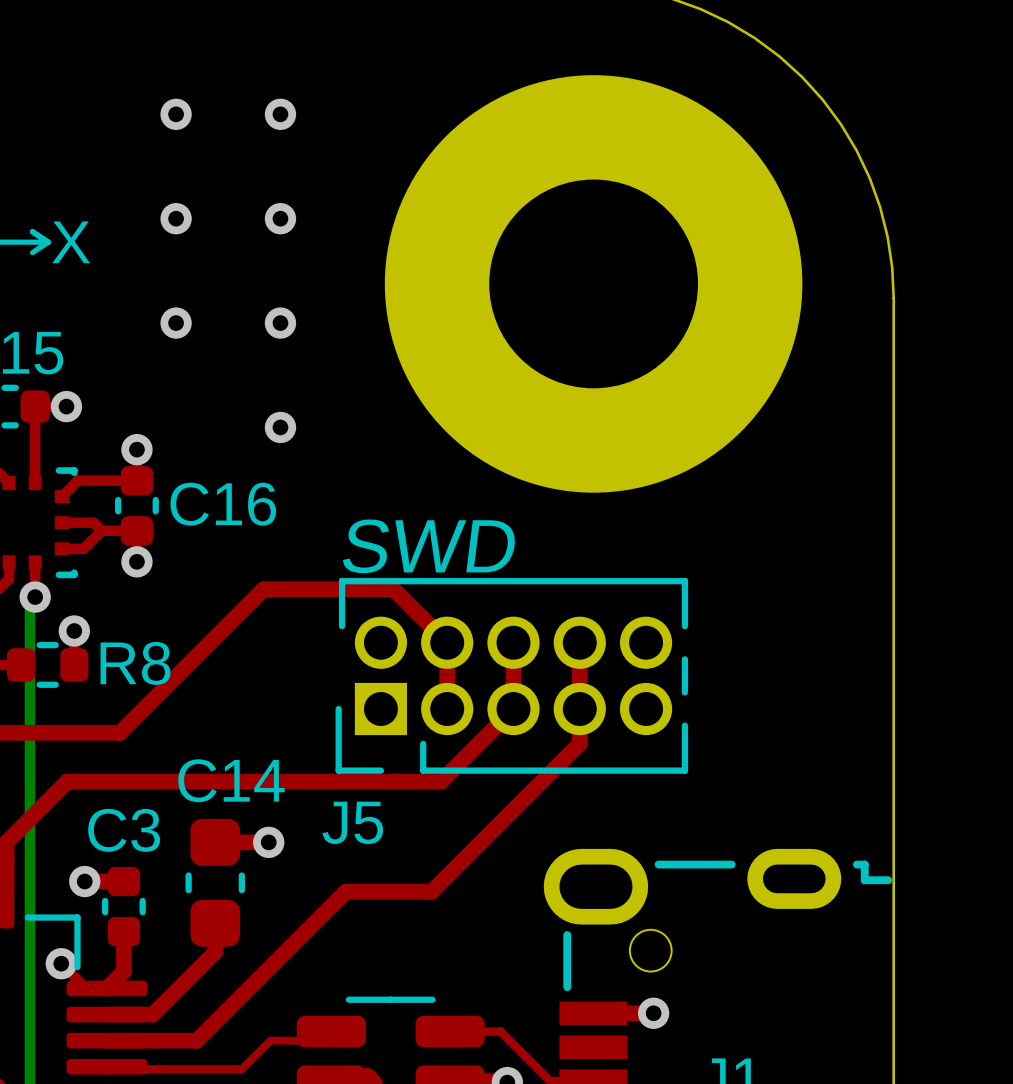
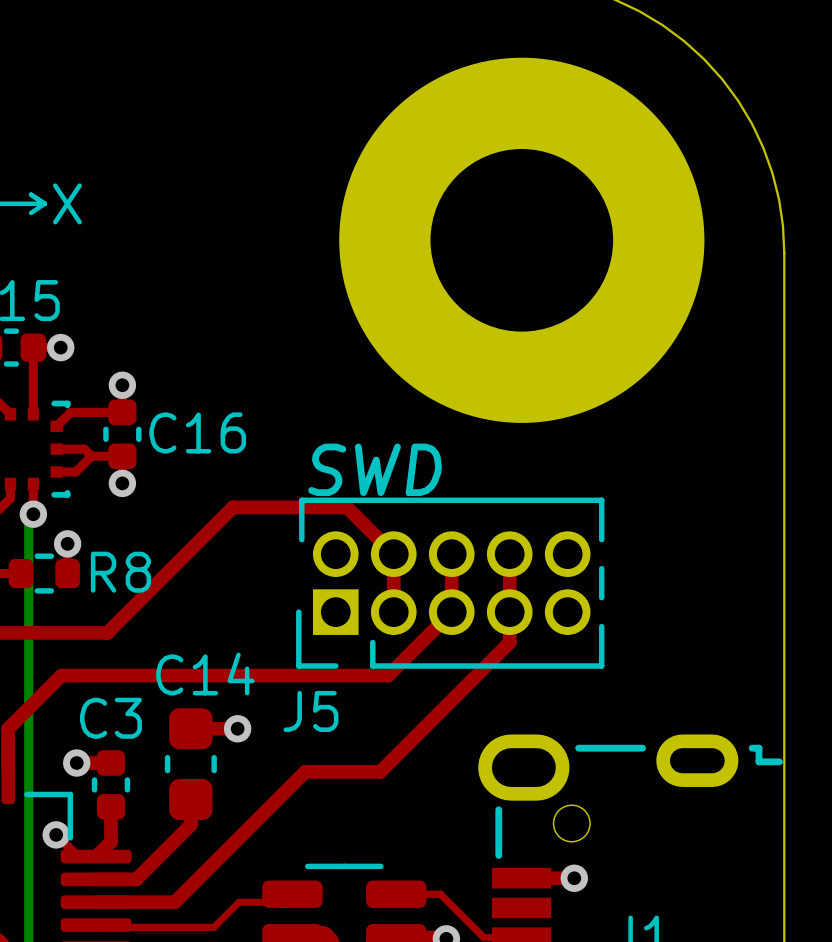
via: (176, 114) -> none
via: (280, 114) -> none
via: (176, 218) -> none
via: (280, 218) -> none
via: (176, 323) -> none
via: (280, 323) -> none
via: (280, 427) -> none

